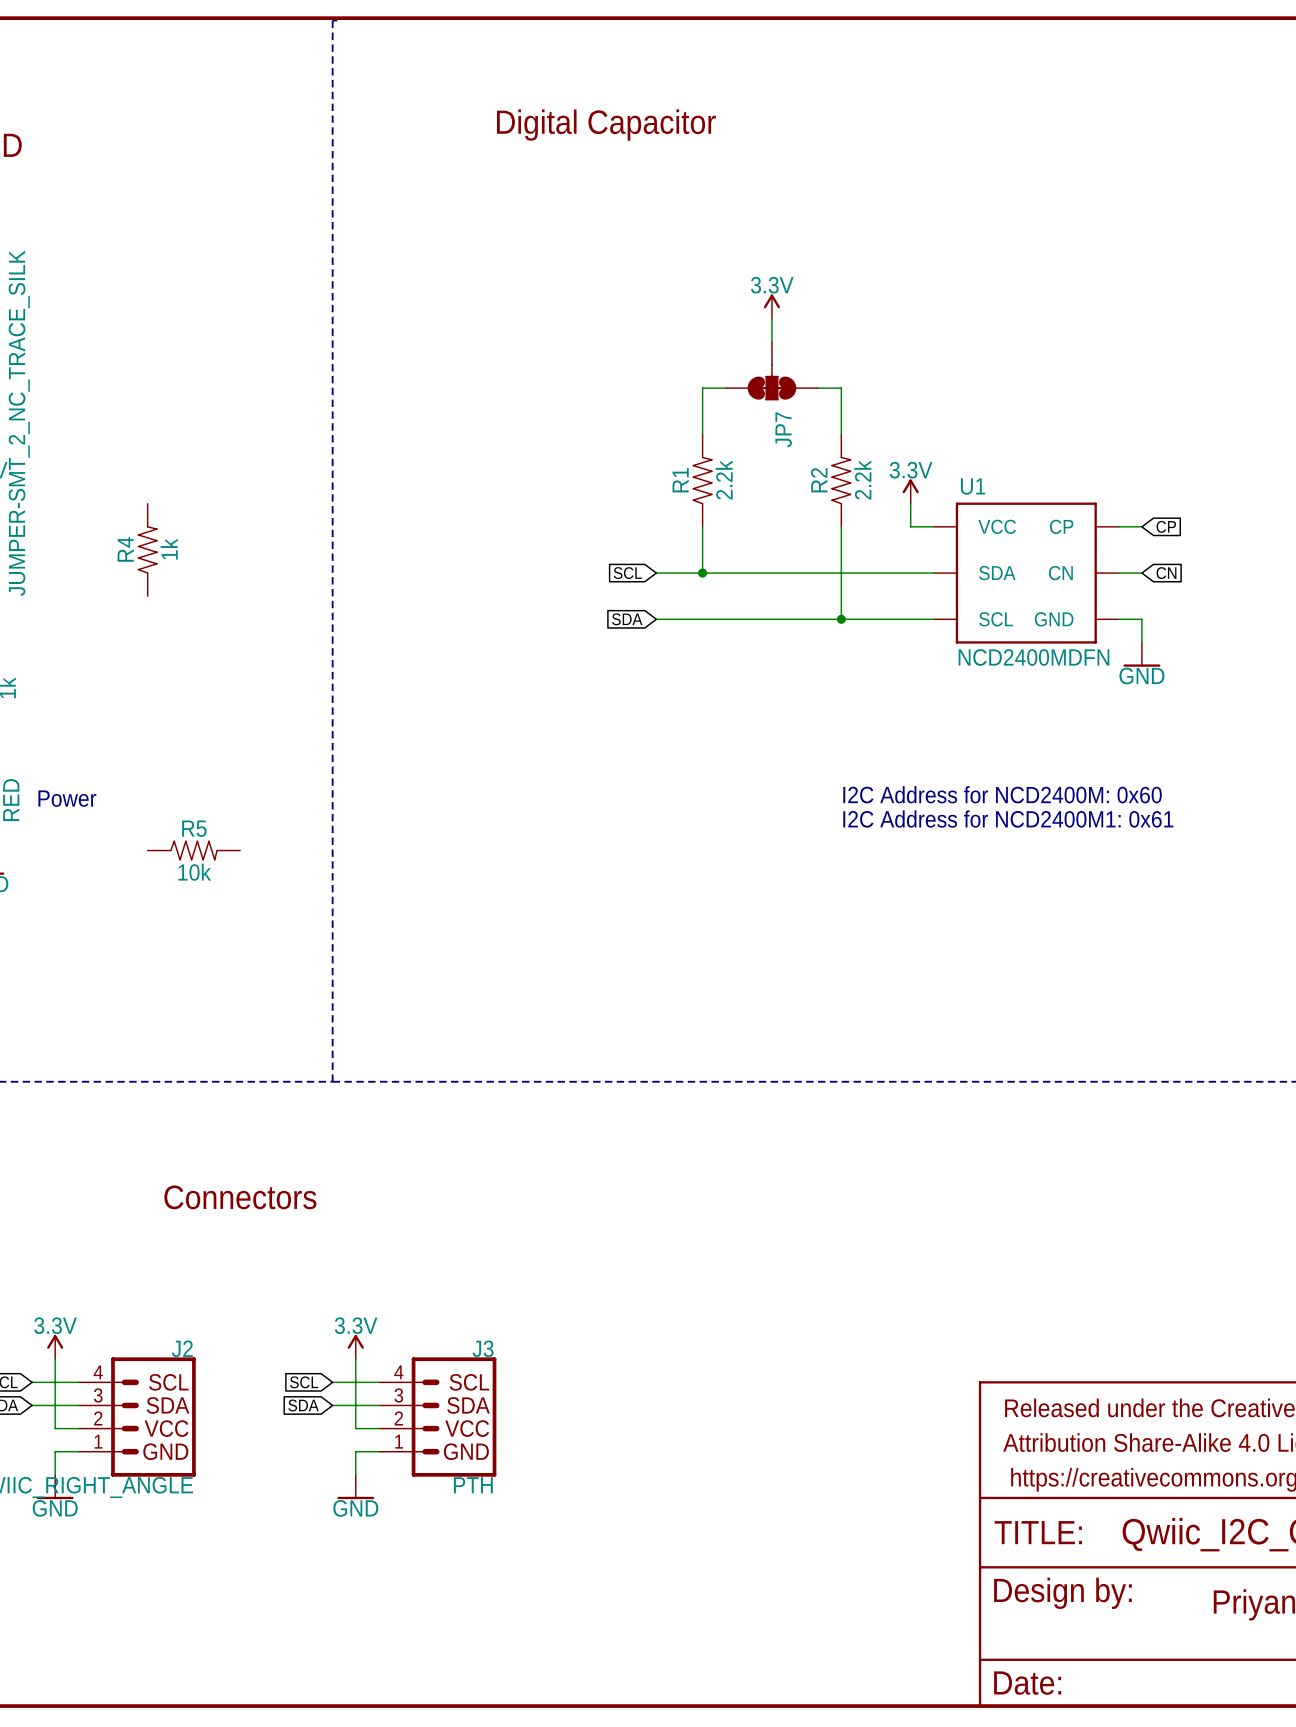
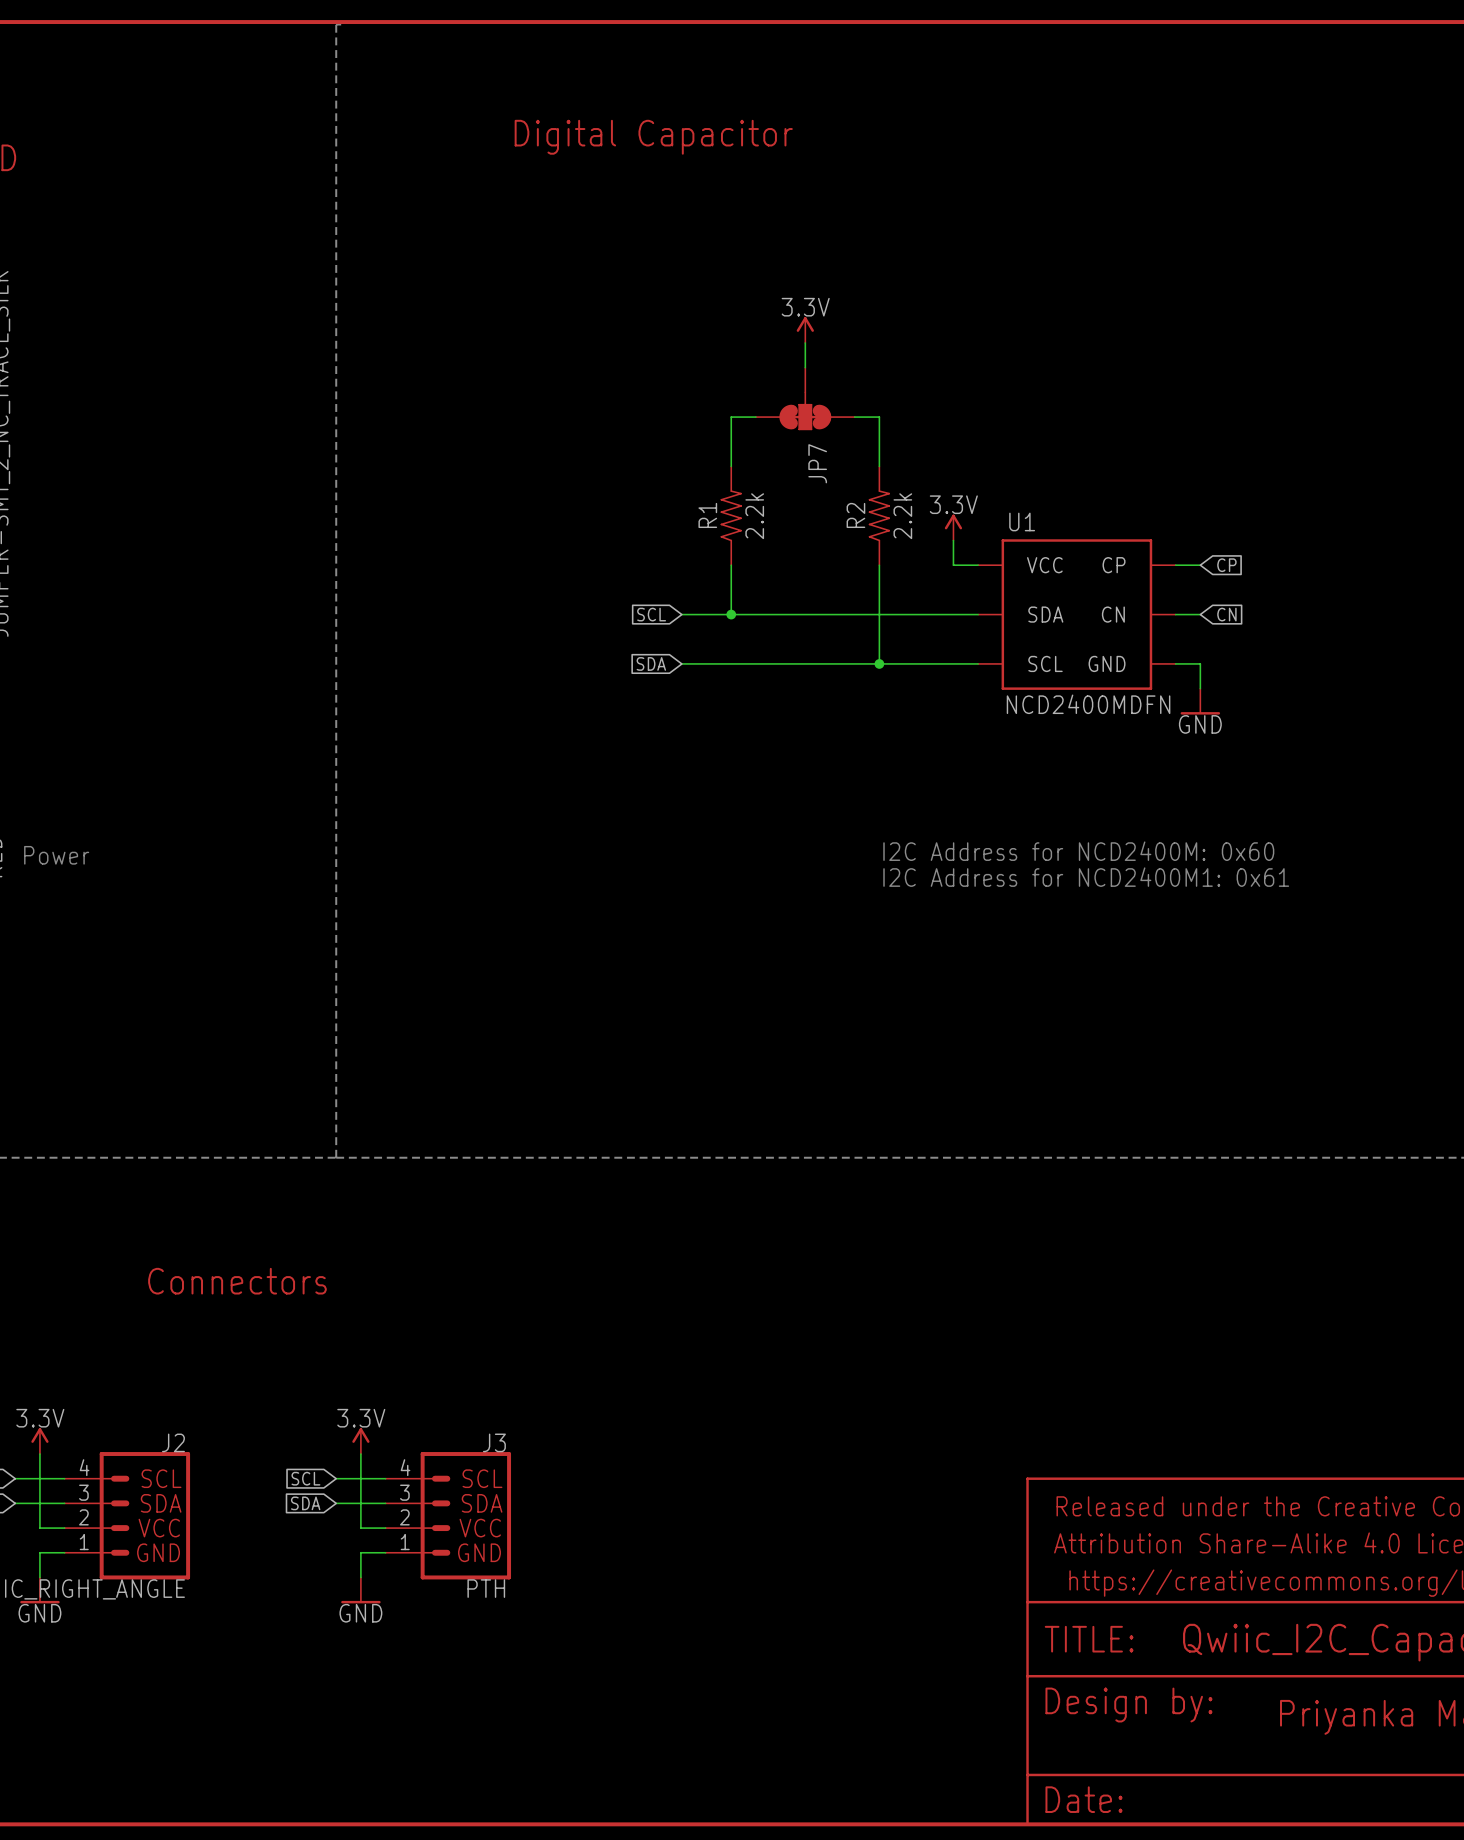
R4: 1k (147, 549) -> none
R5: 10k (193, 850) -> none

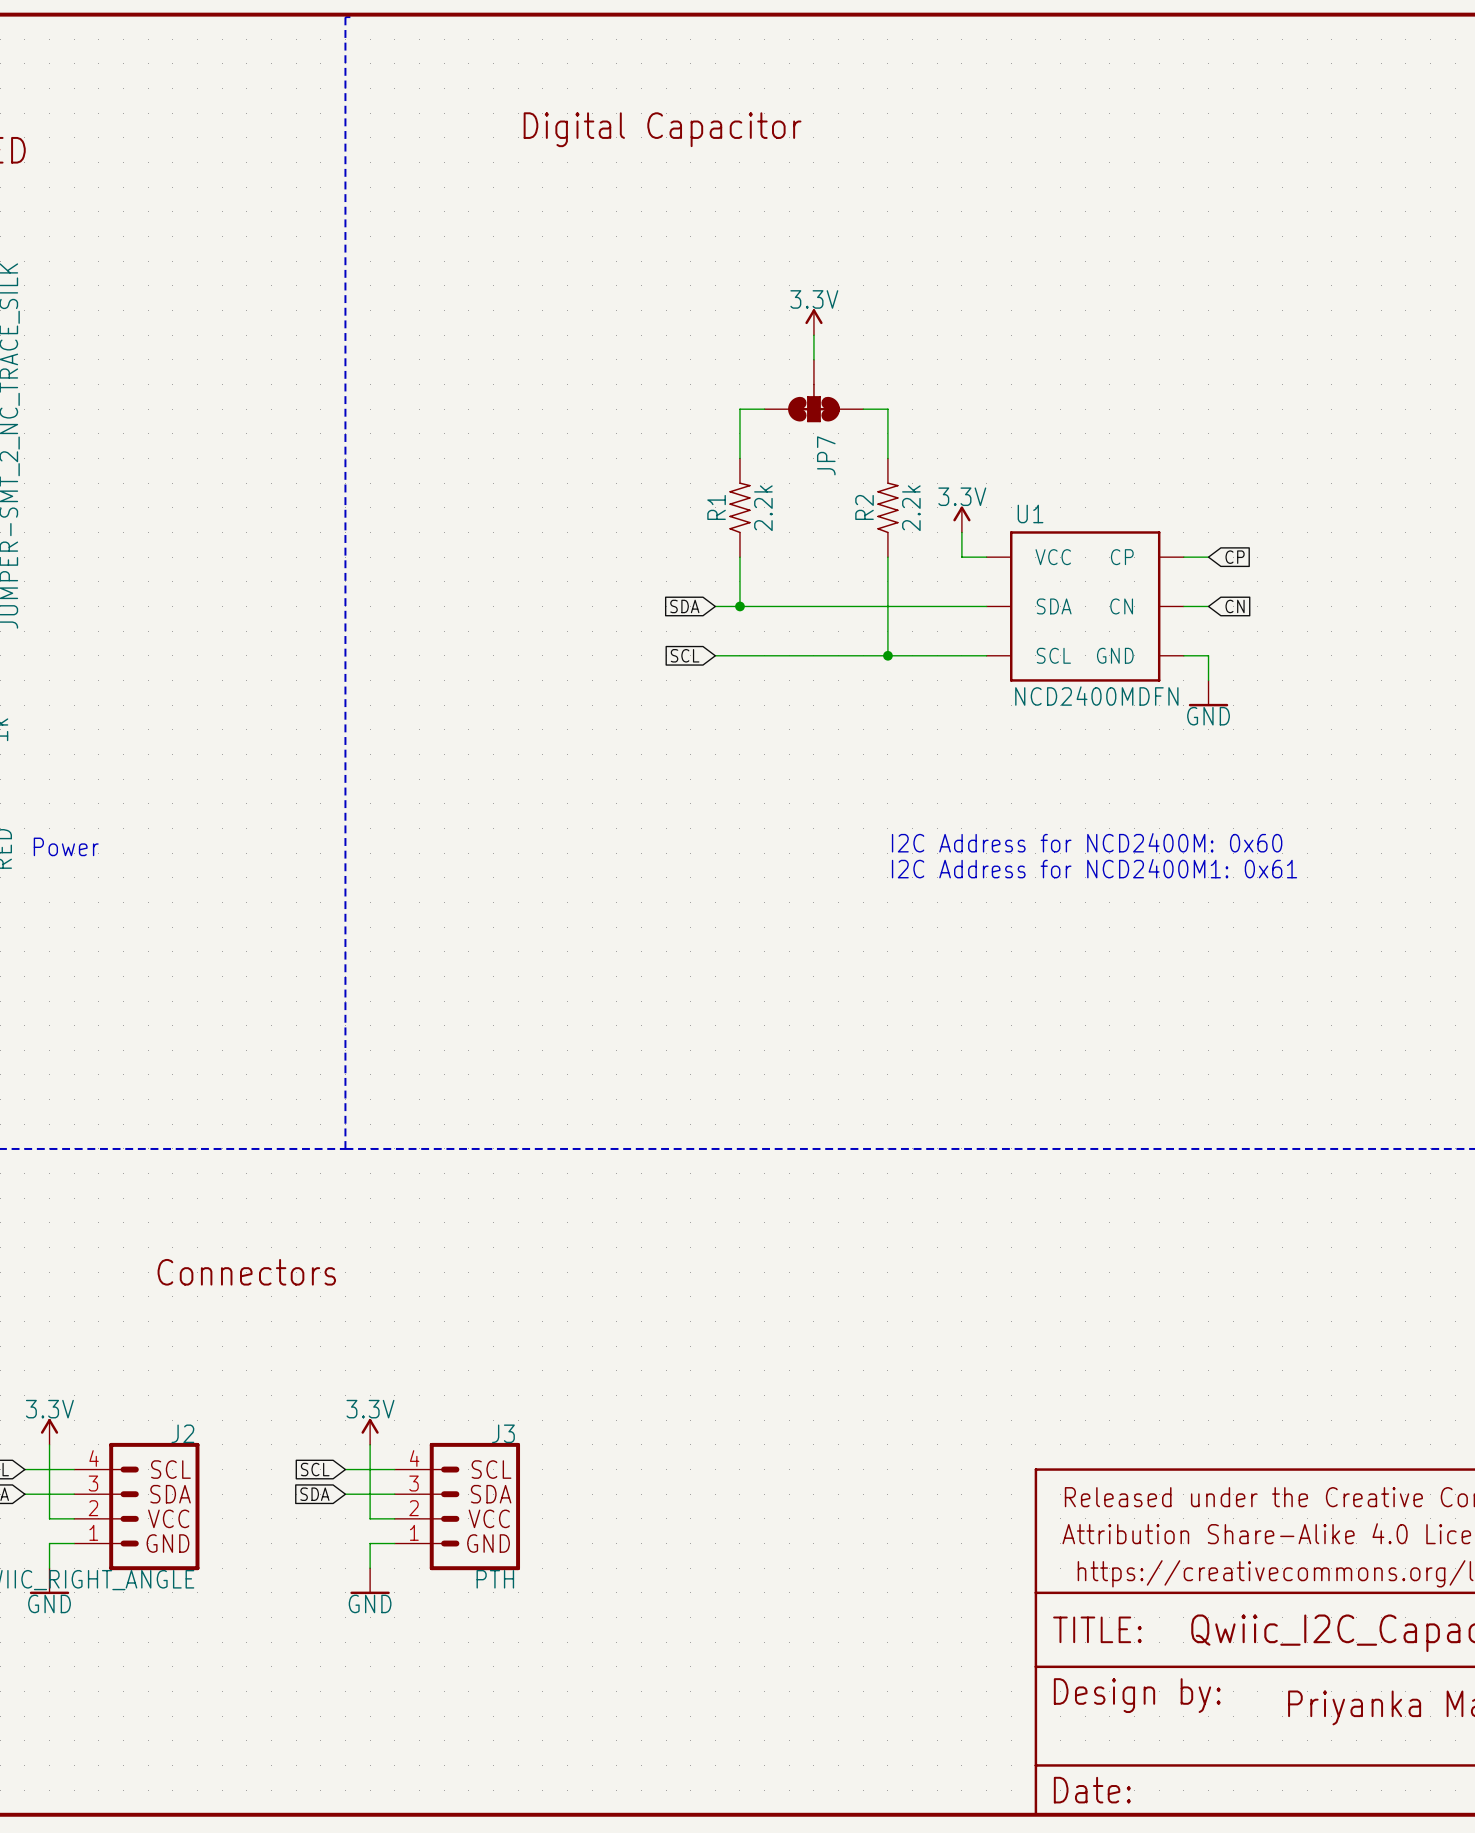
global label position: SCL (651, 614) -> SCL (685, 655)
wire: (681, 614) (706, 614) -> none
global label position: SDA (651, 663) -> SDA (684, 606)
wire: (681, 663) (706, 663) -> none

